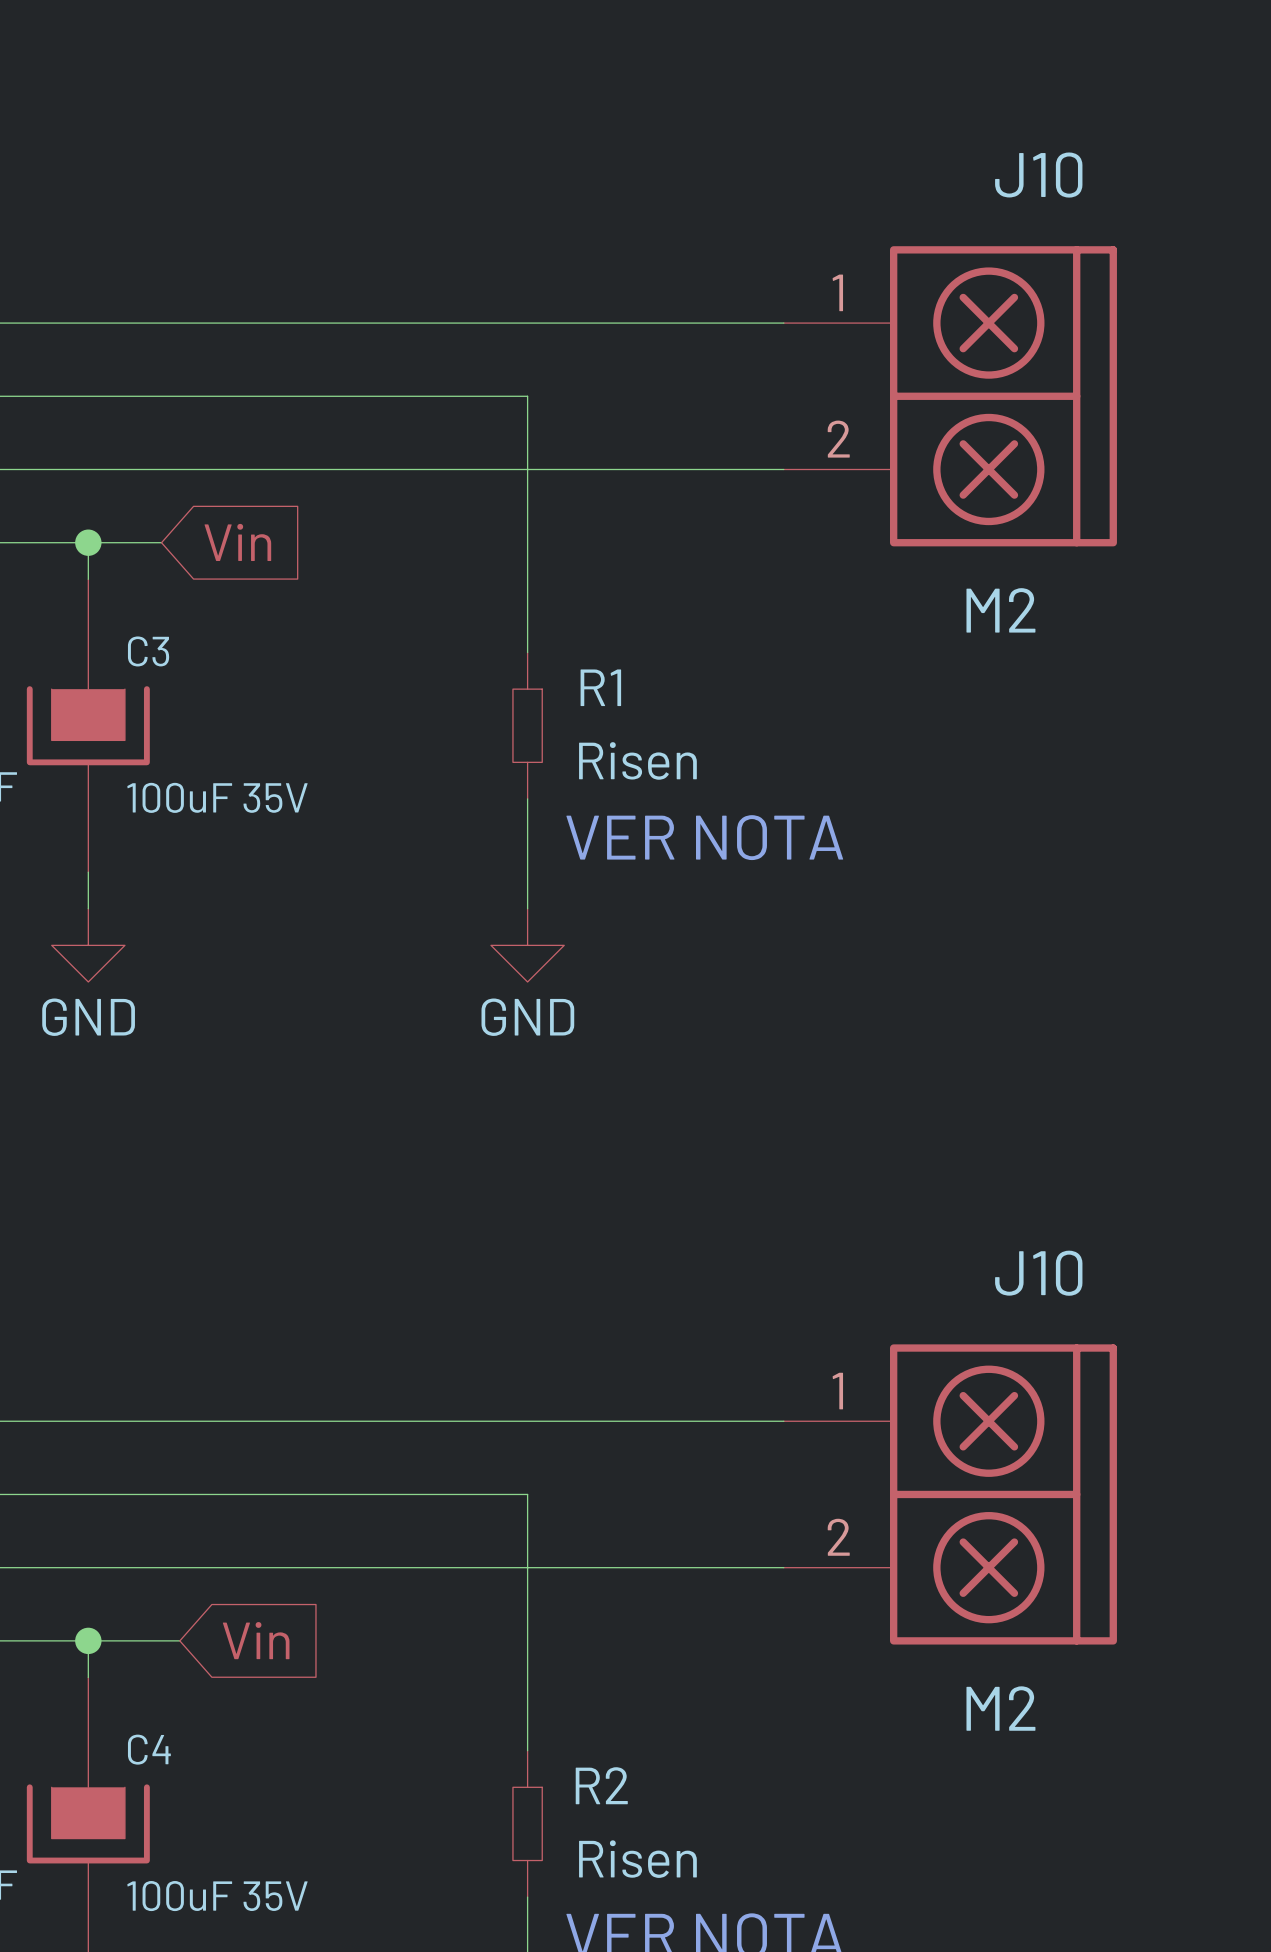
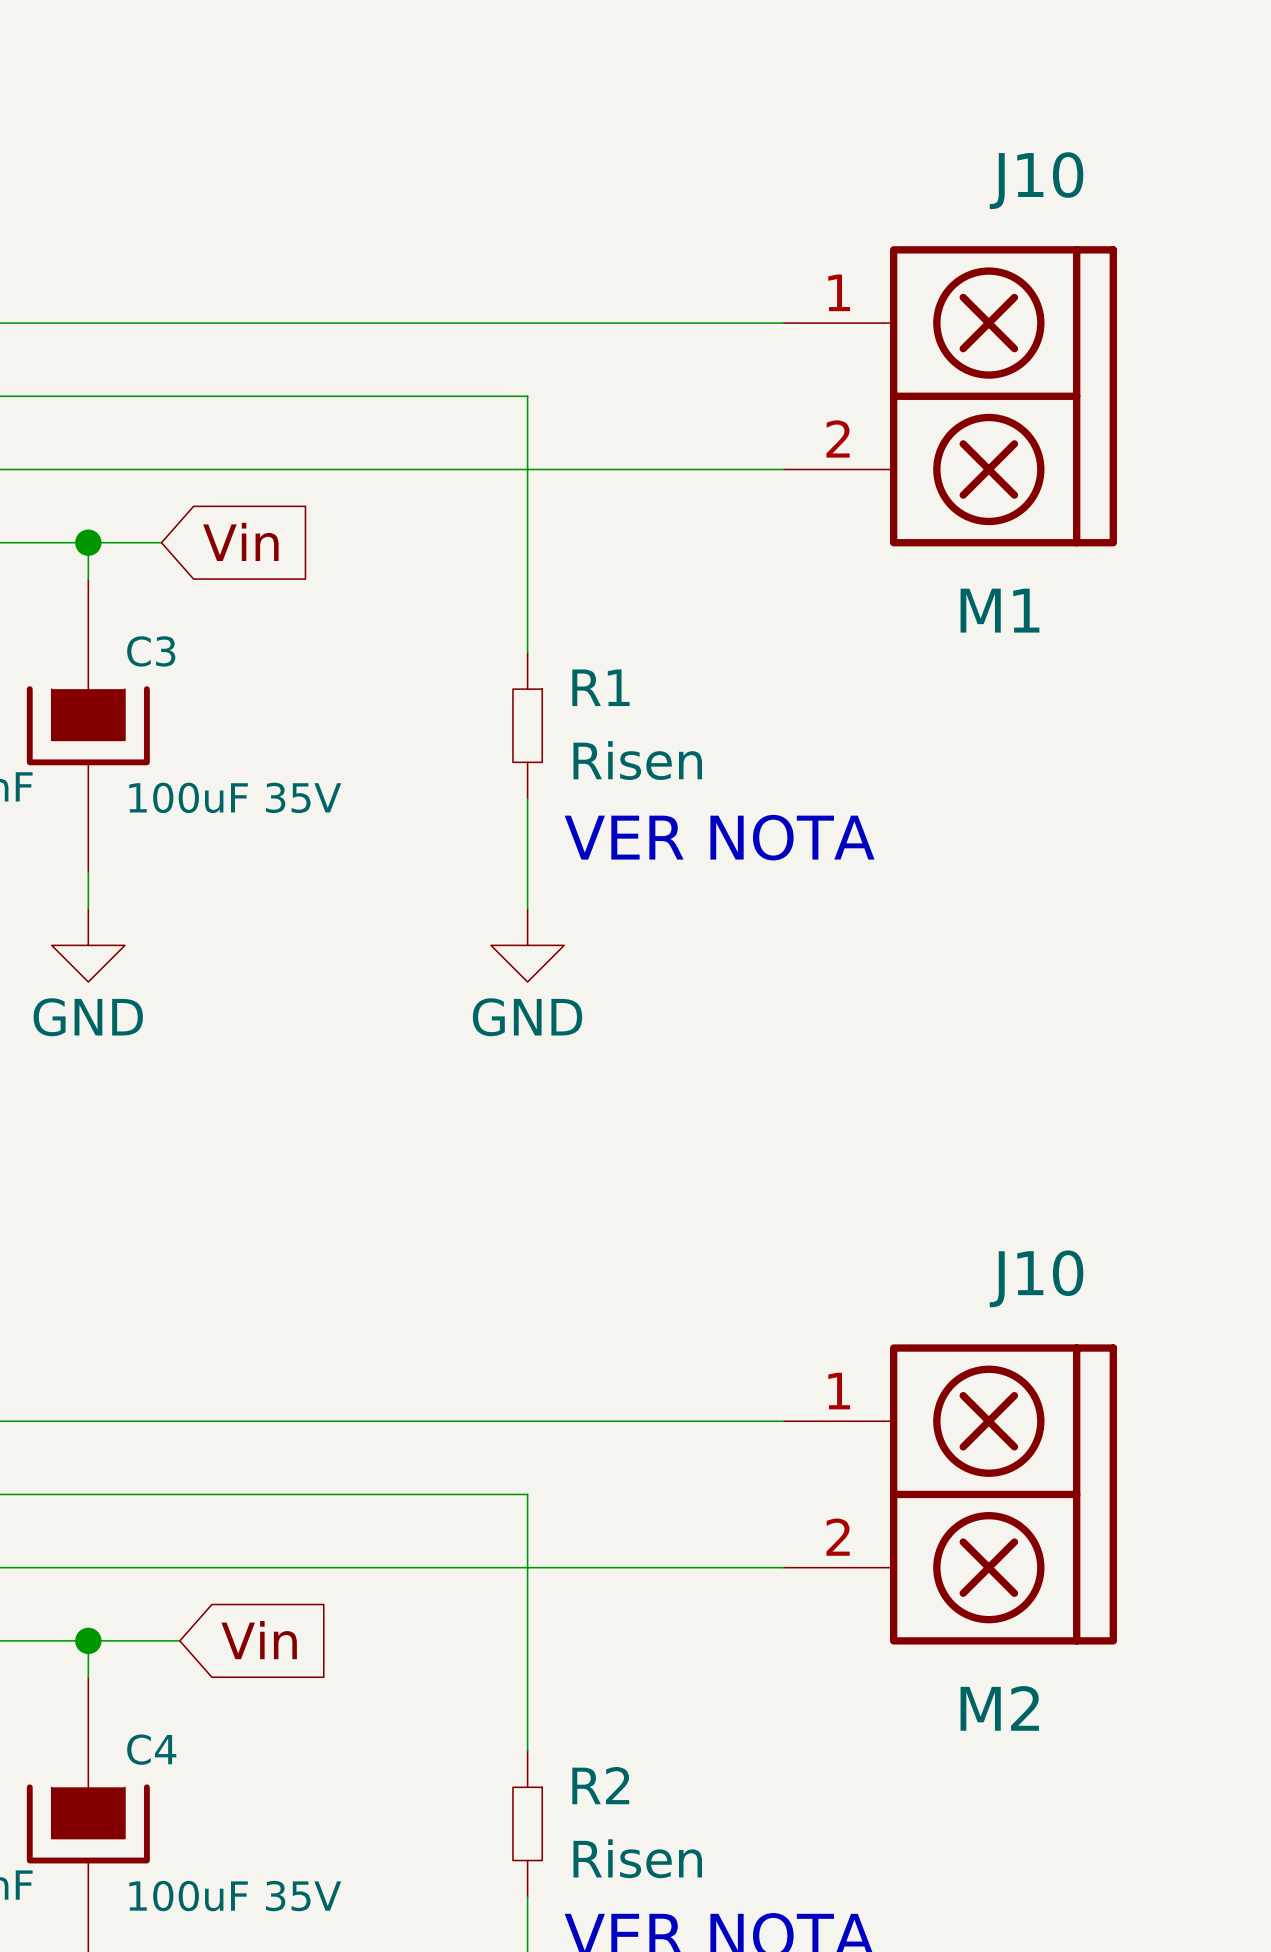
J10 value: M2 (1000, 610) -> M1 (999, 610)

